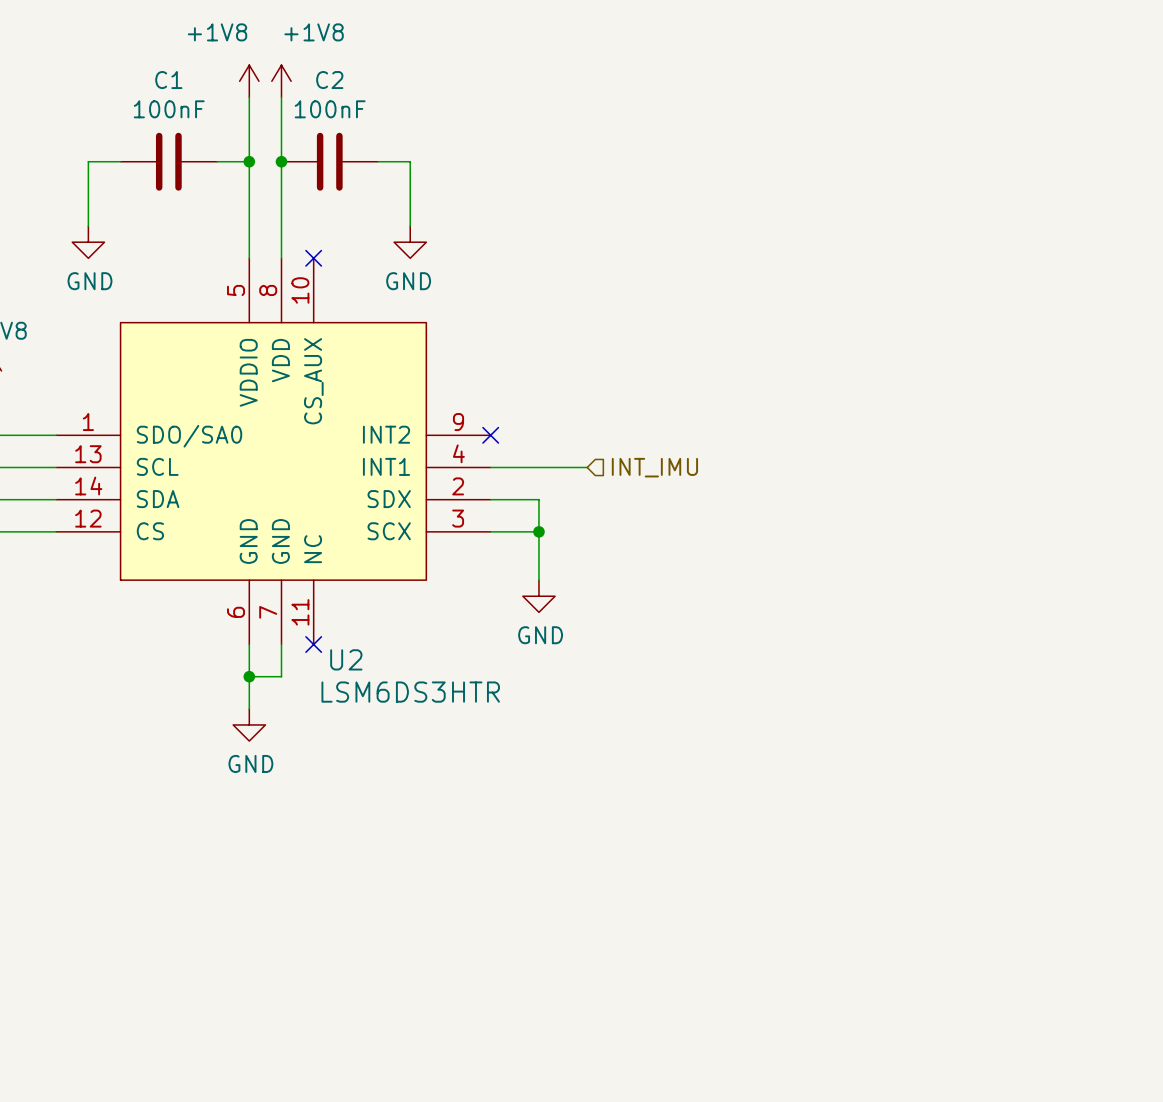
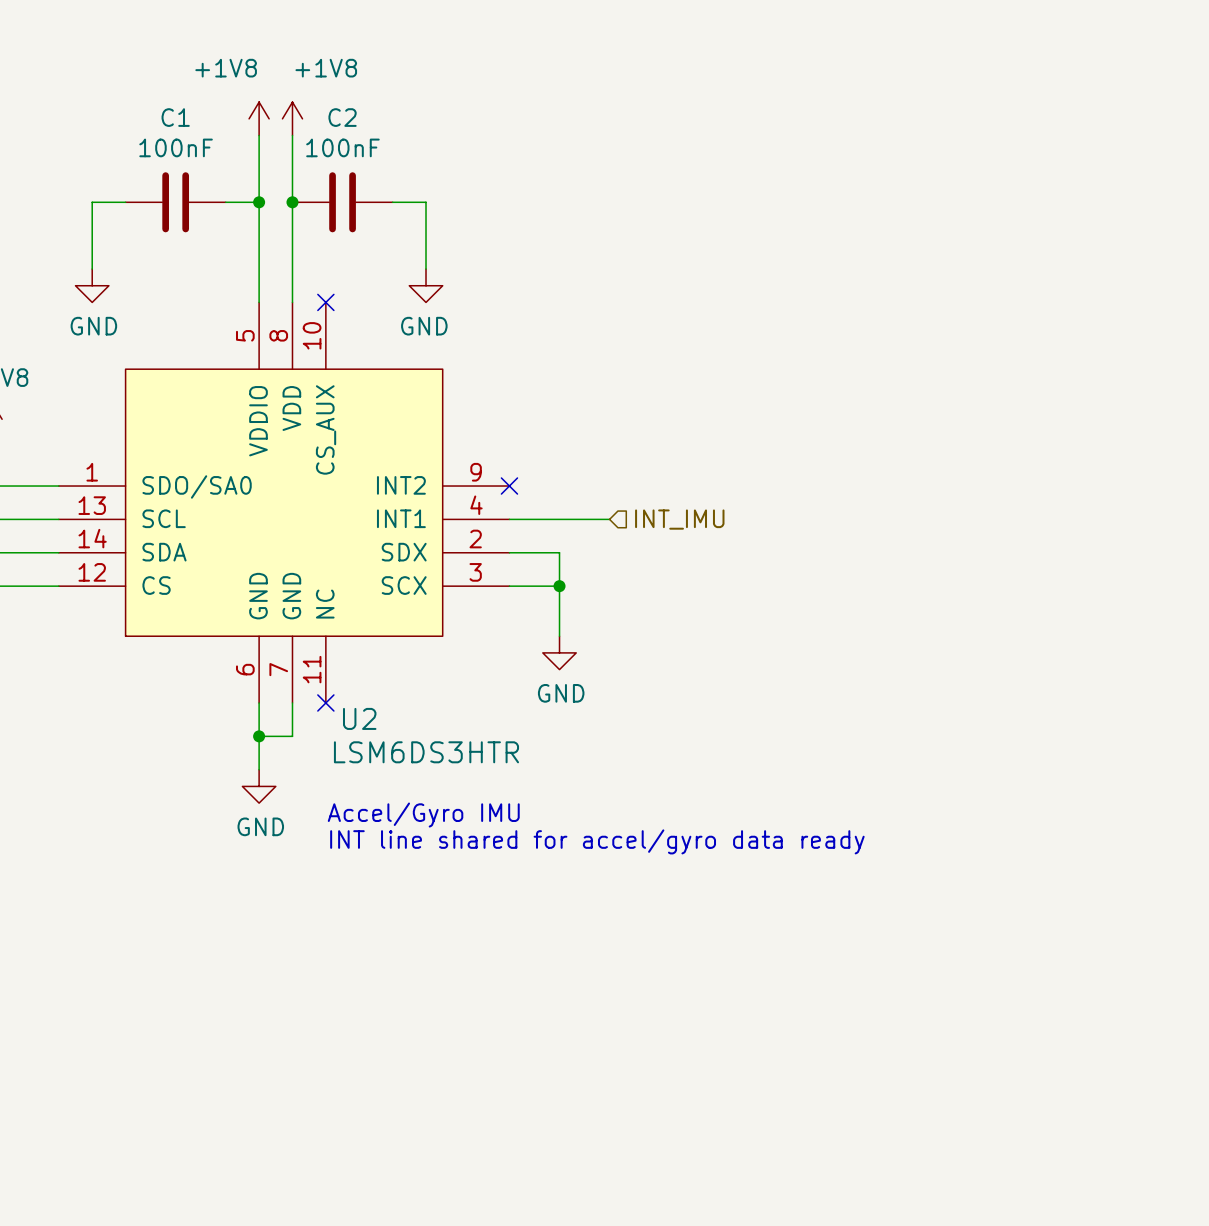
text: none -> Accel/Gyro IMU (423, 815)
text: none -> INT line shared for accel/gyro data ready (597, 841)

